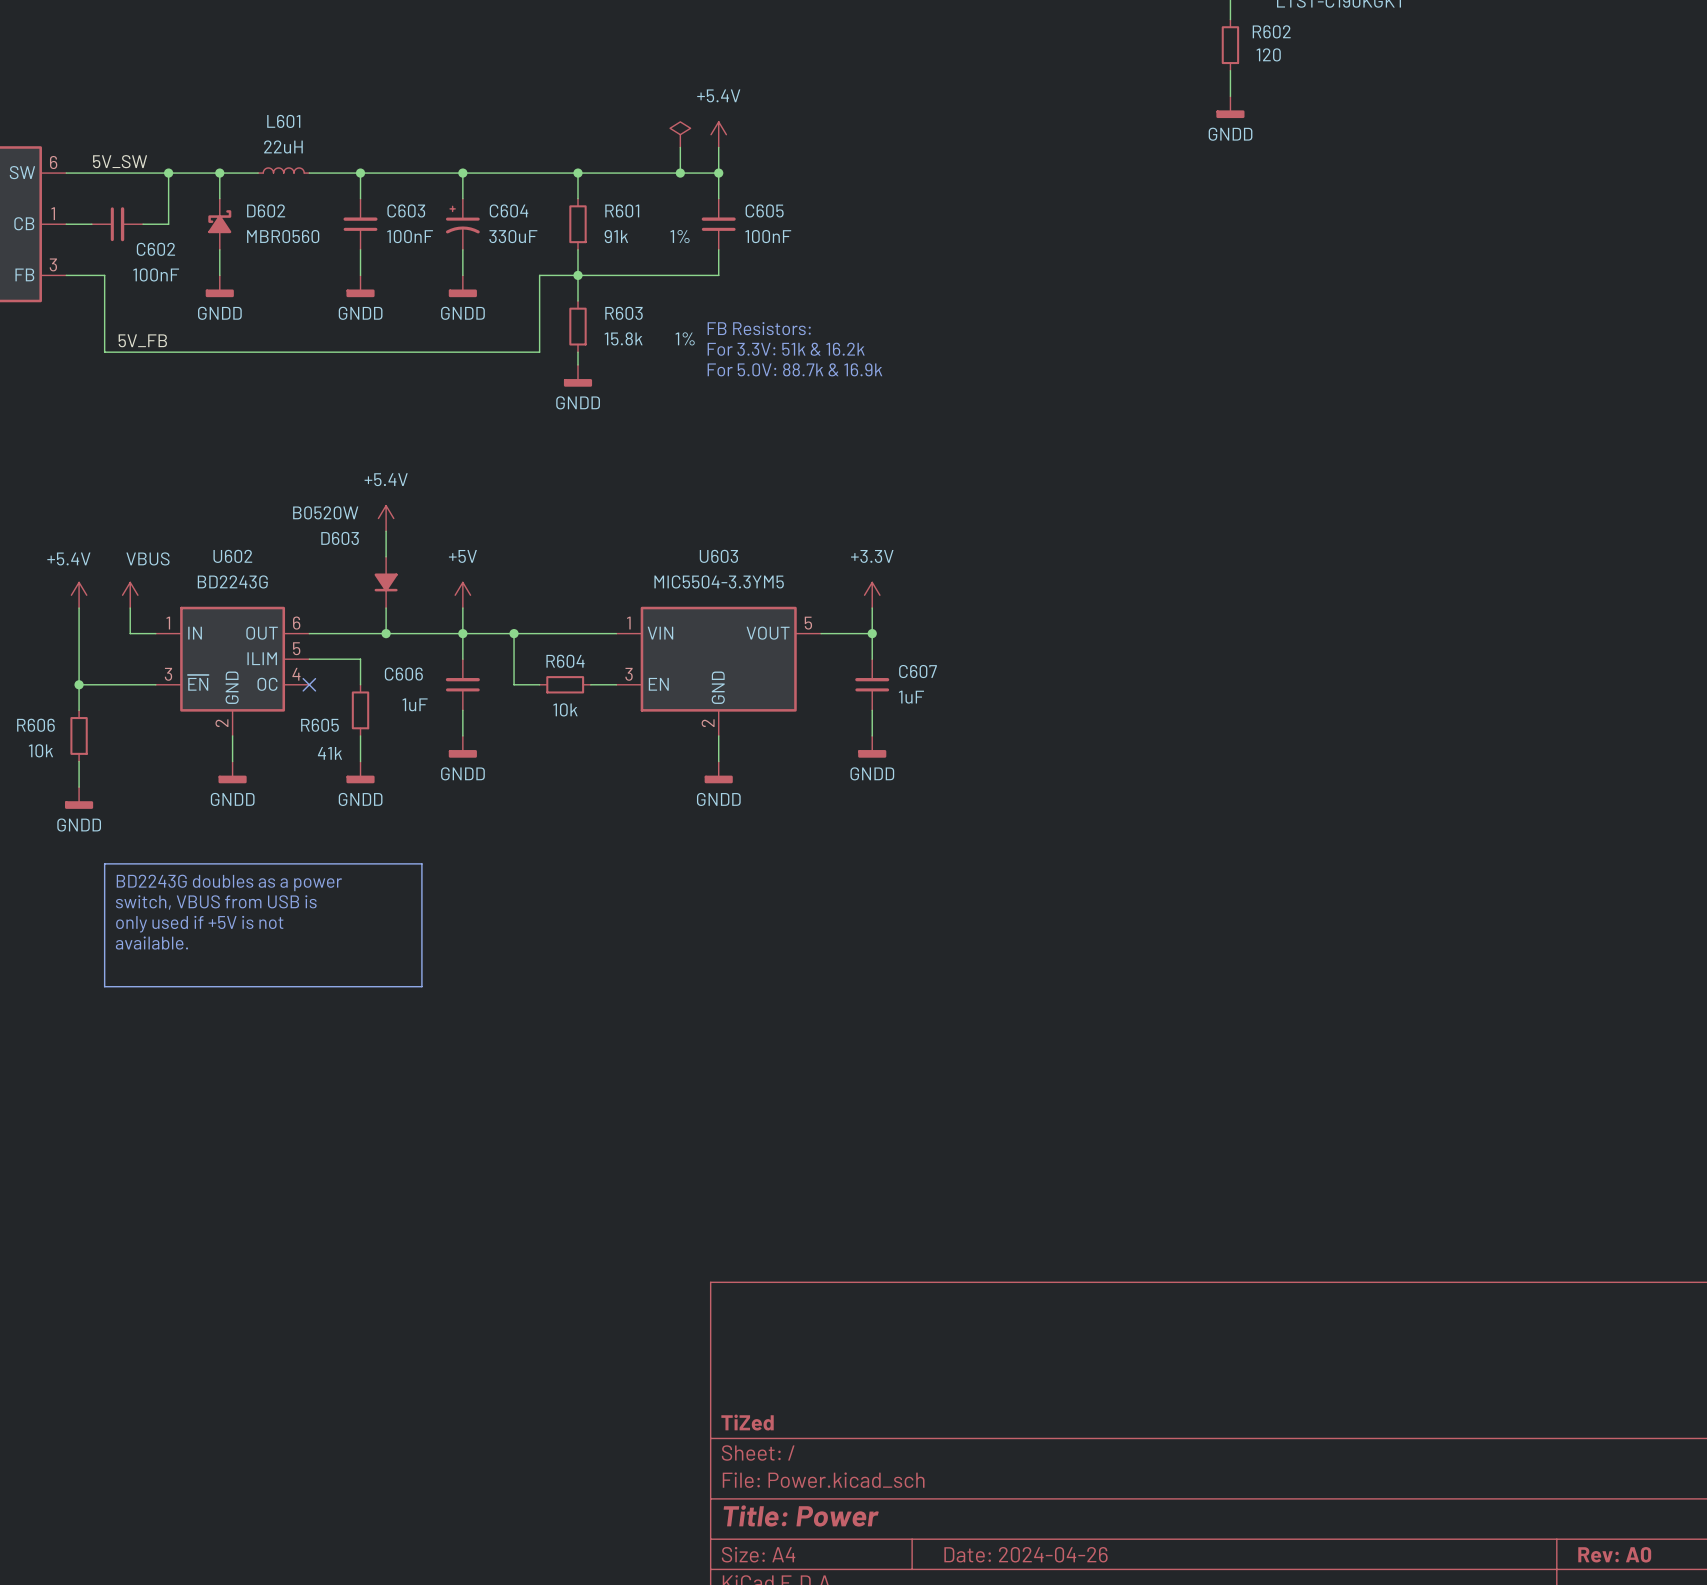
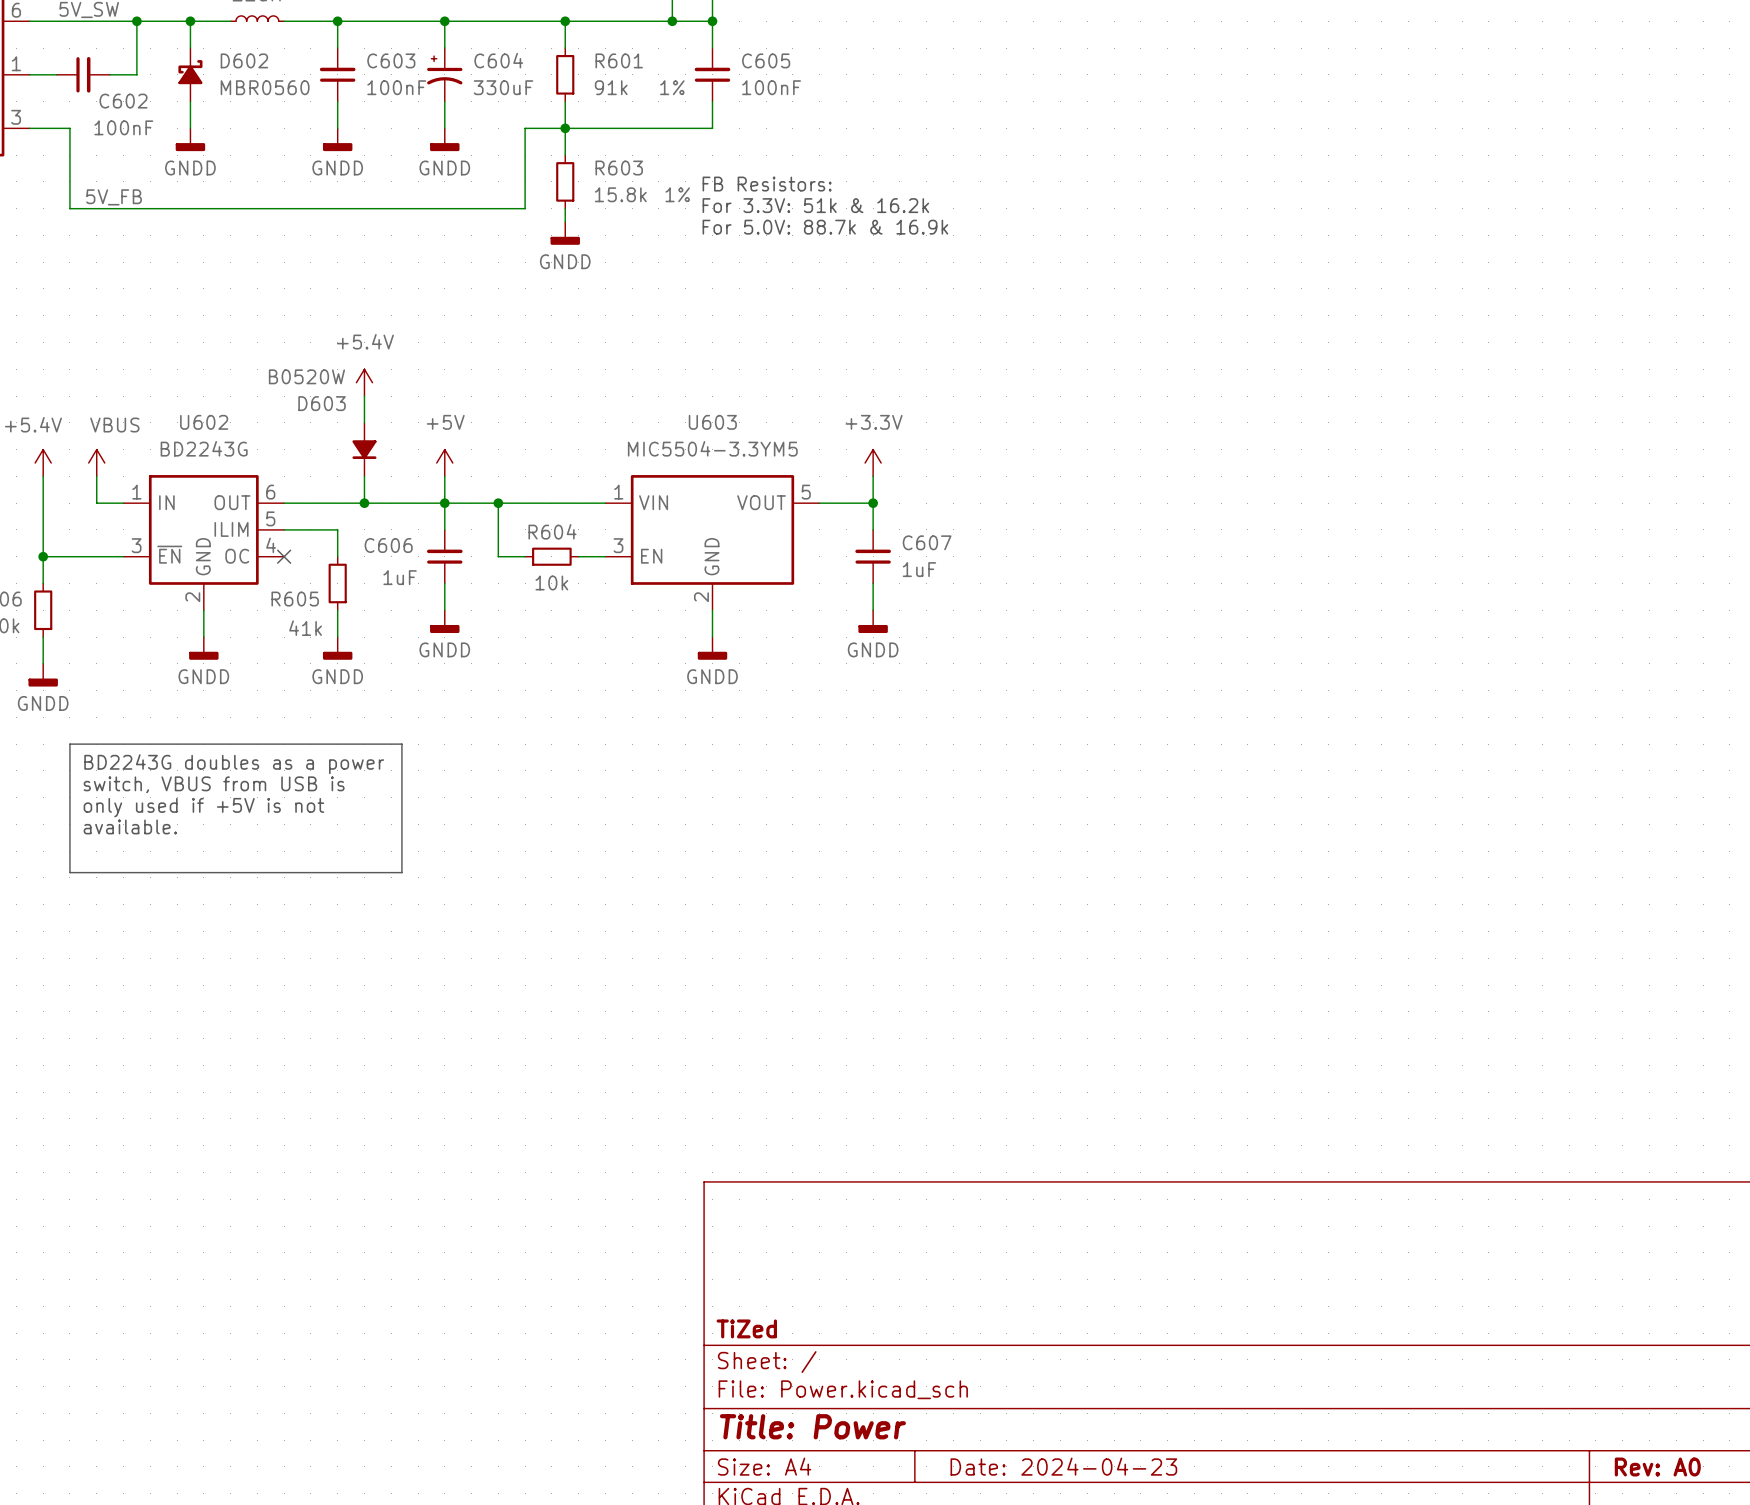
title block: Date: 2024-04-26 (1026, 1554) -> Date: 2024-04-23 (1063, 1466)

